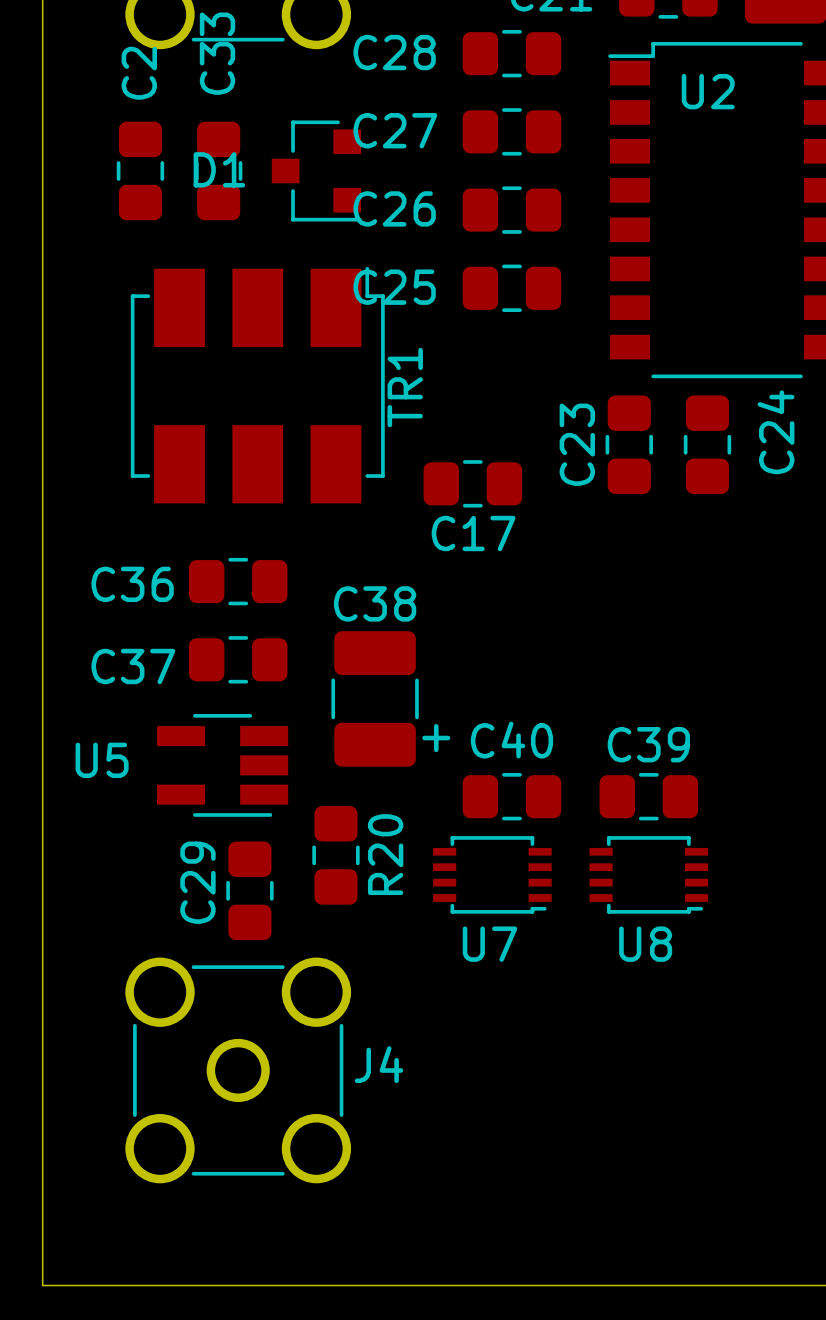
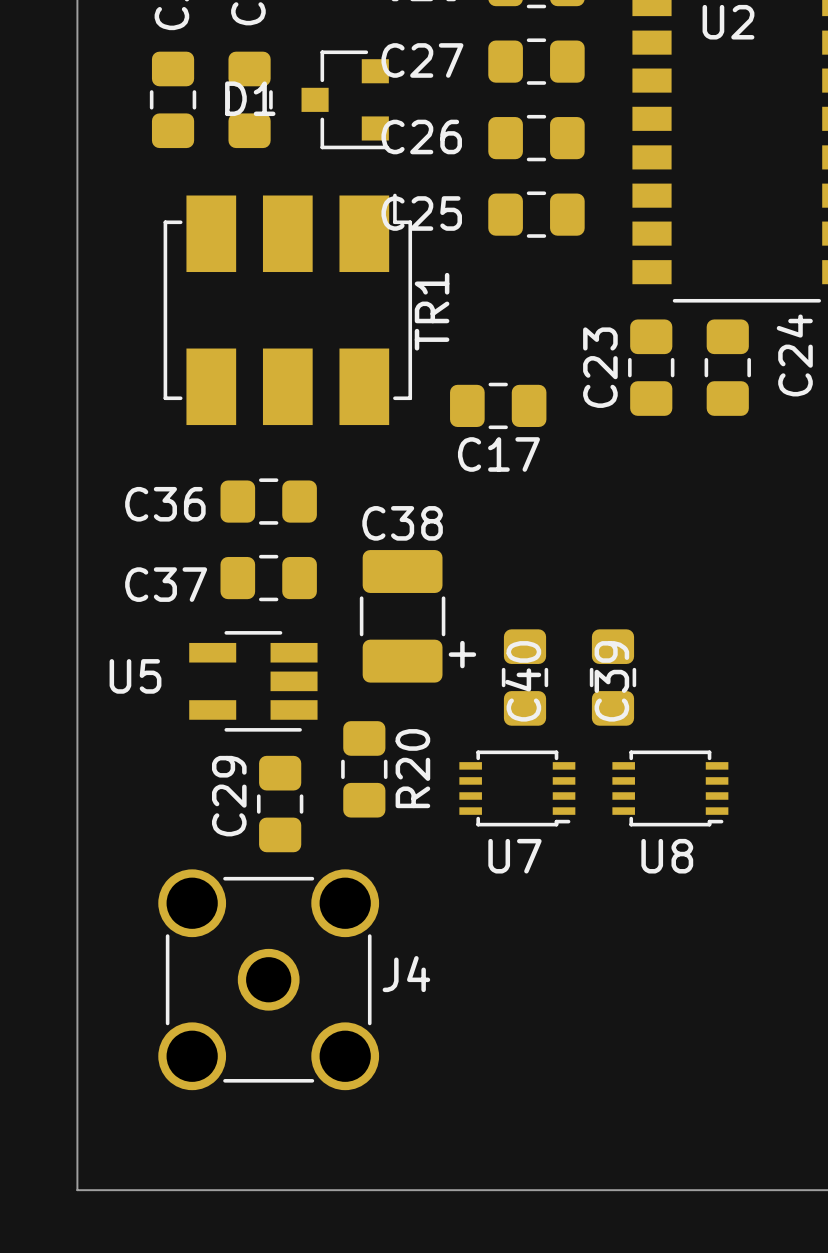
C40 rotation: 0° (511, 796) -> 90° clockwise (525, 677)
C39 rotation: 0° (648, 796) -> 90° clockwise (612, 677)
C39 position: (648, 796) -> (612, 677)

